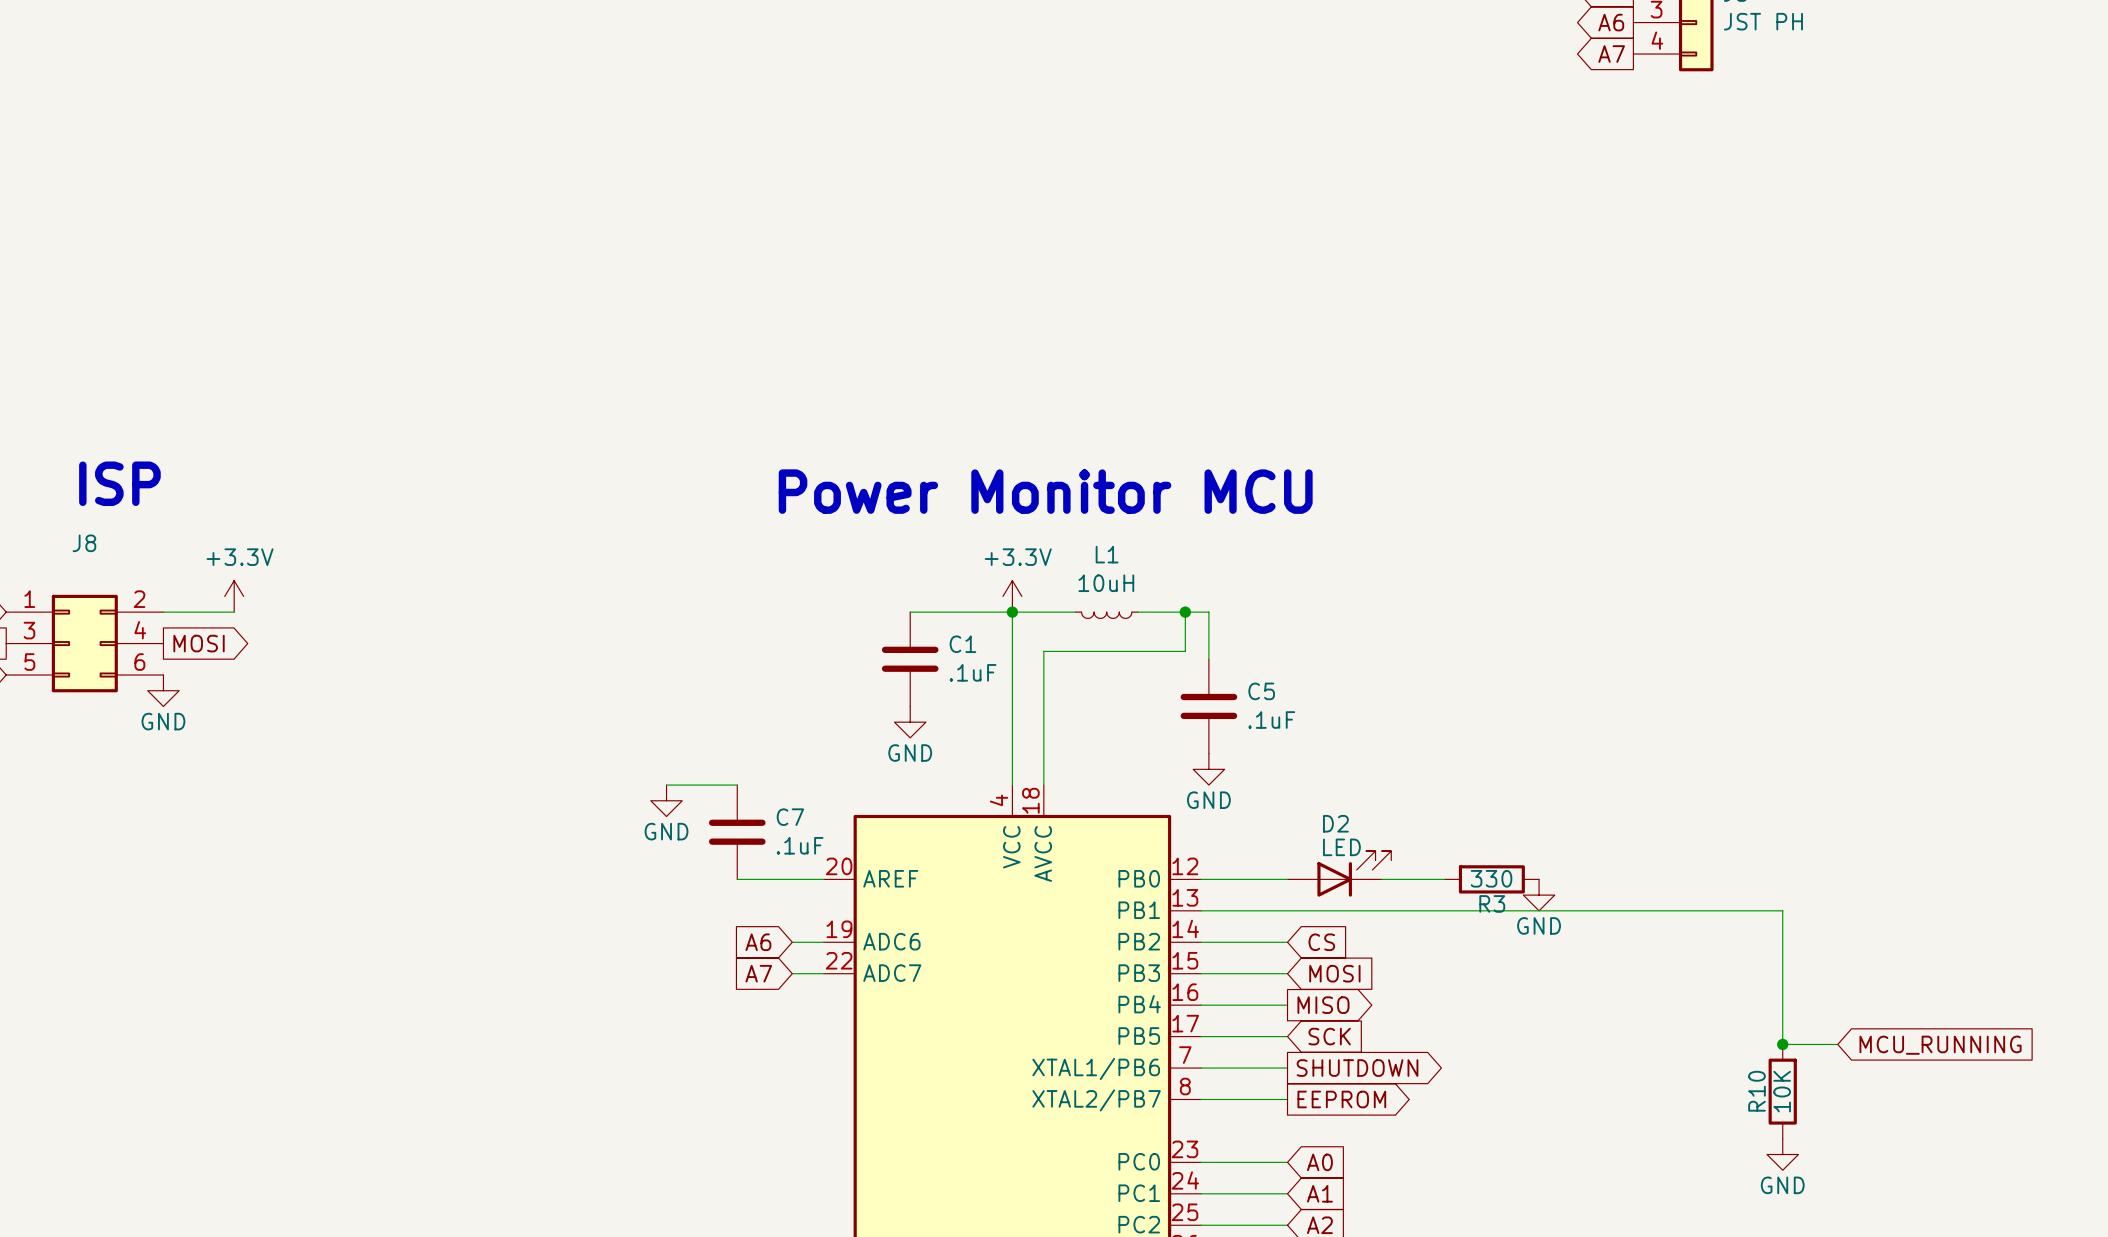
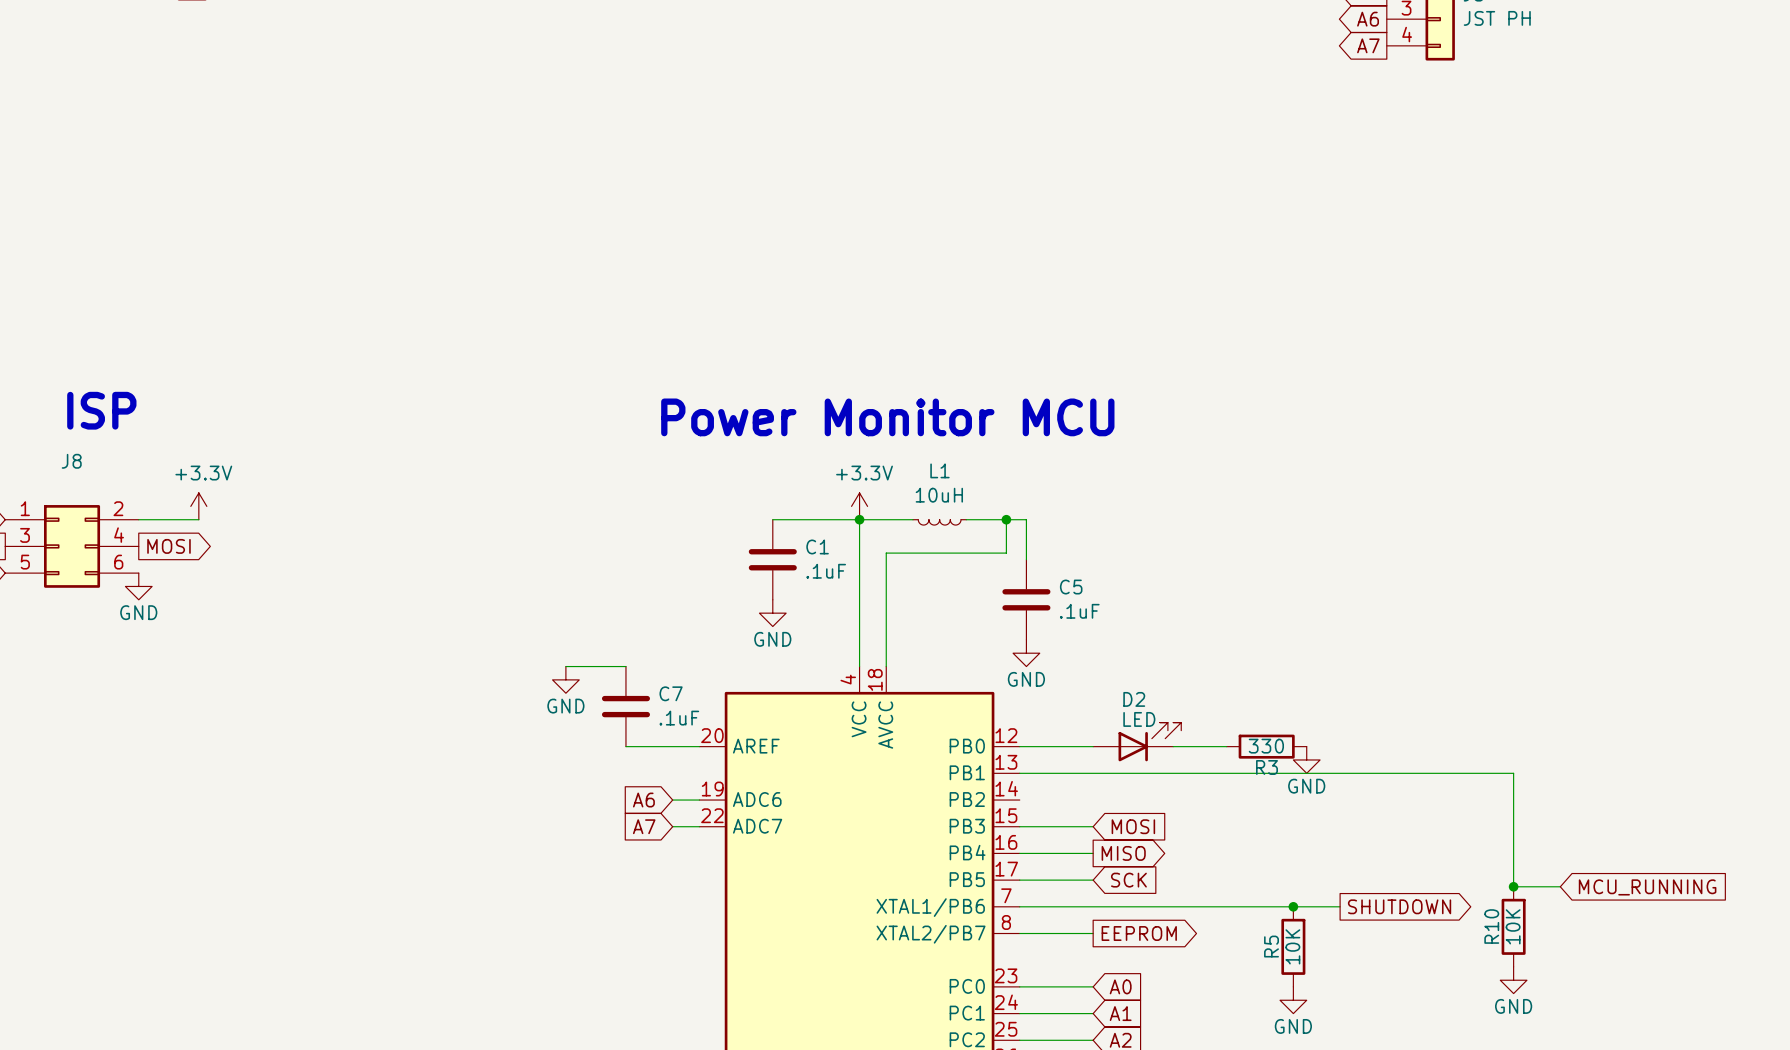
wire: (1201, 942) (1287, 942) -> none
global label: CS (1321, 942) -> none
wire: none -> (1093, 906) (1340, 906)
global label position: SHUTDOWN (1357, 1068) -> SHUTDOWN (1399, 906)
junction: none -> (1293, 906)
R5: none -> 10K (1293, 946)
power symbol: none -> GND (1293, 1000)

